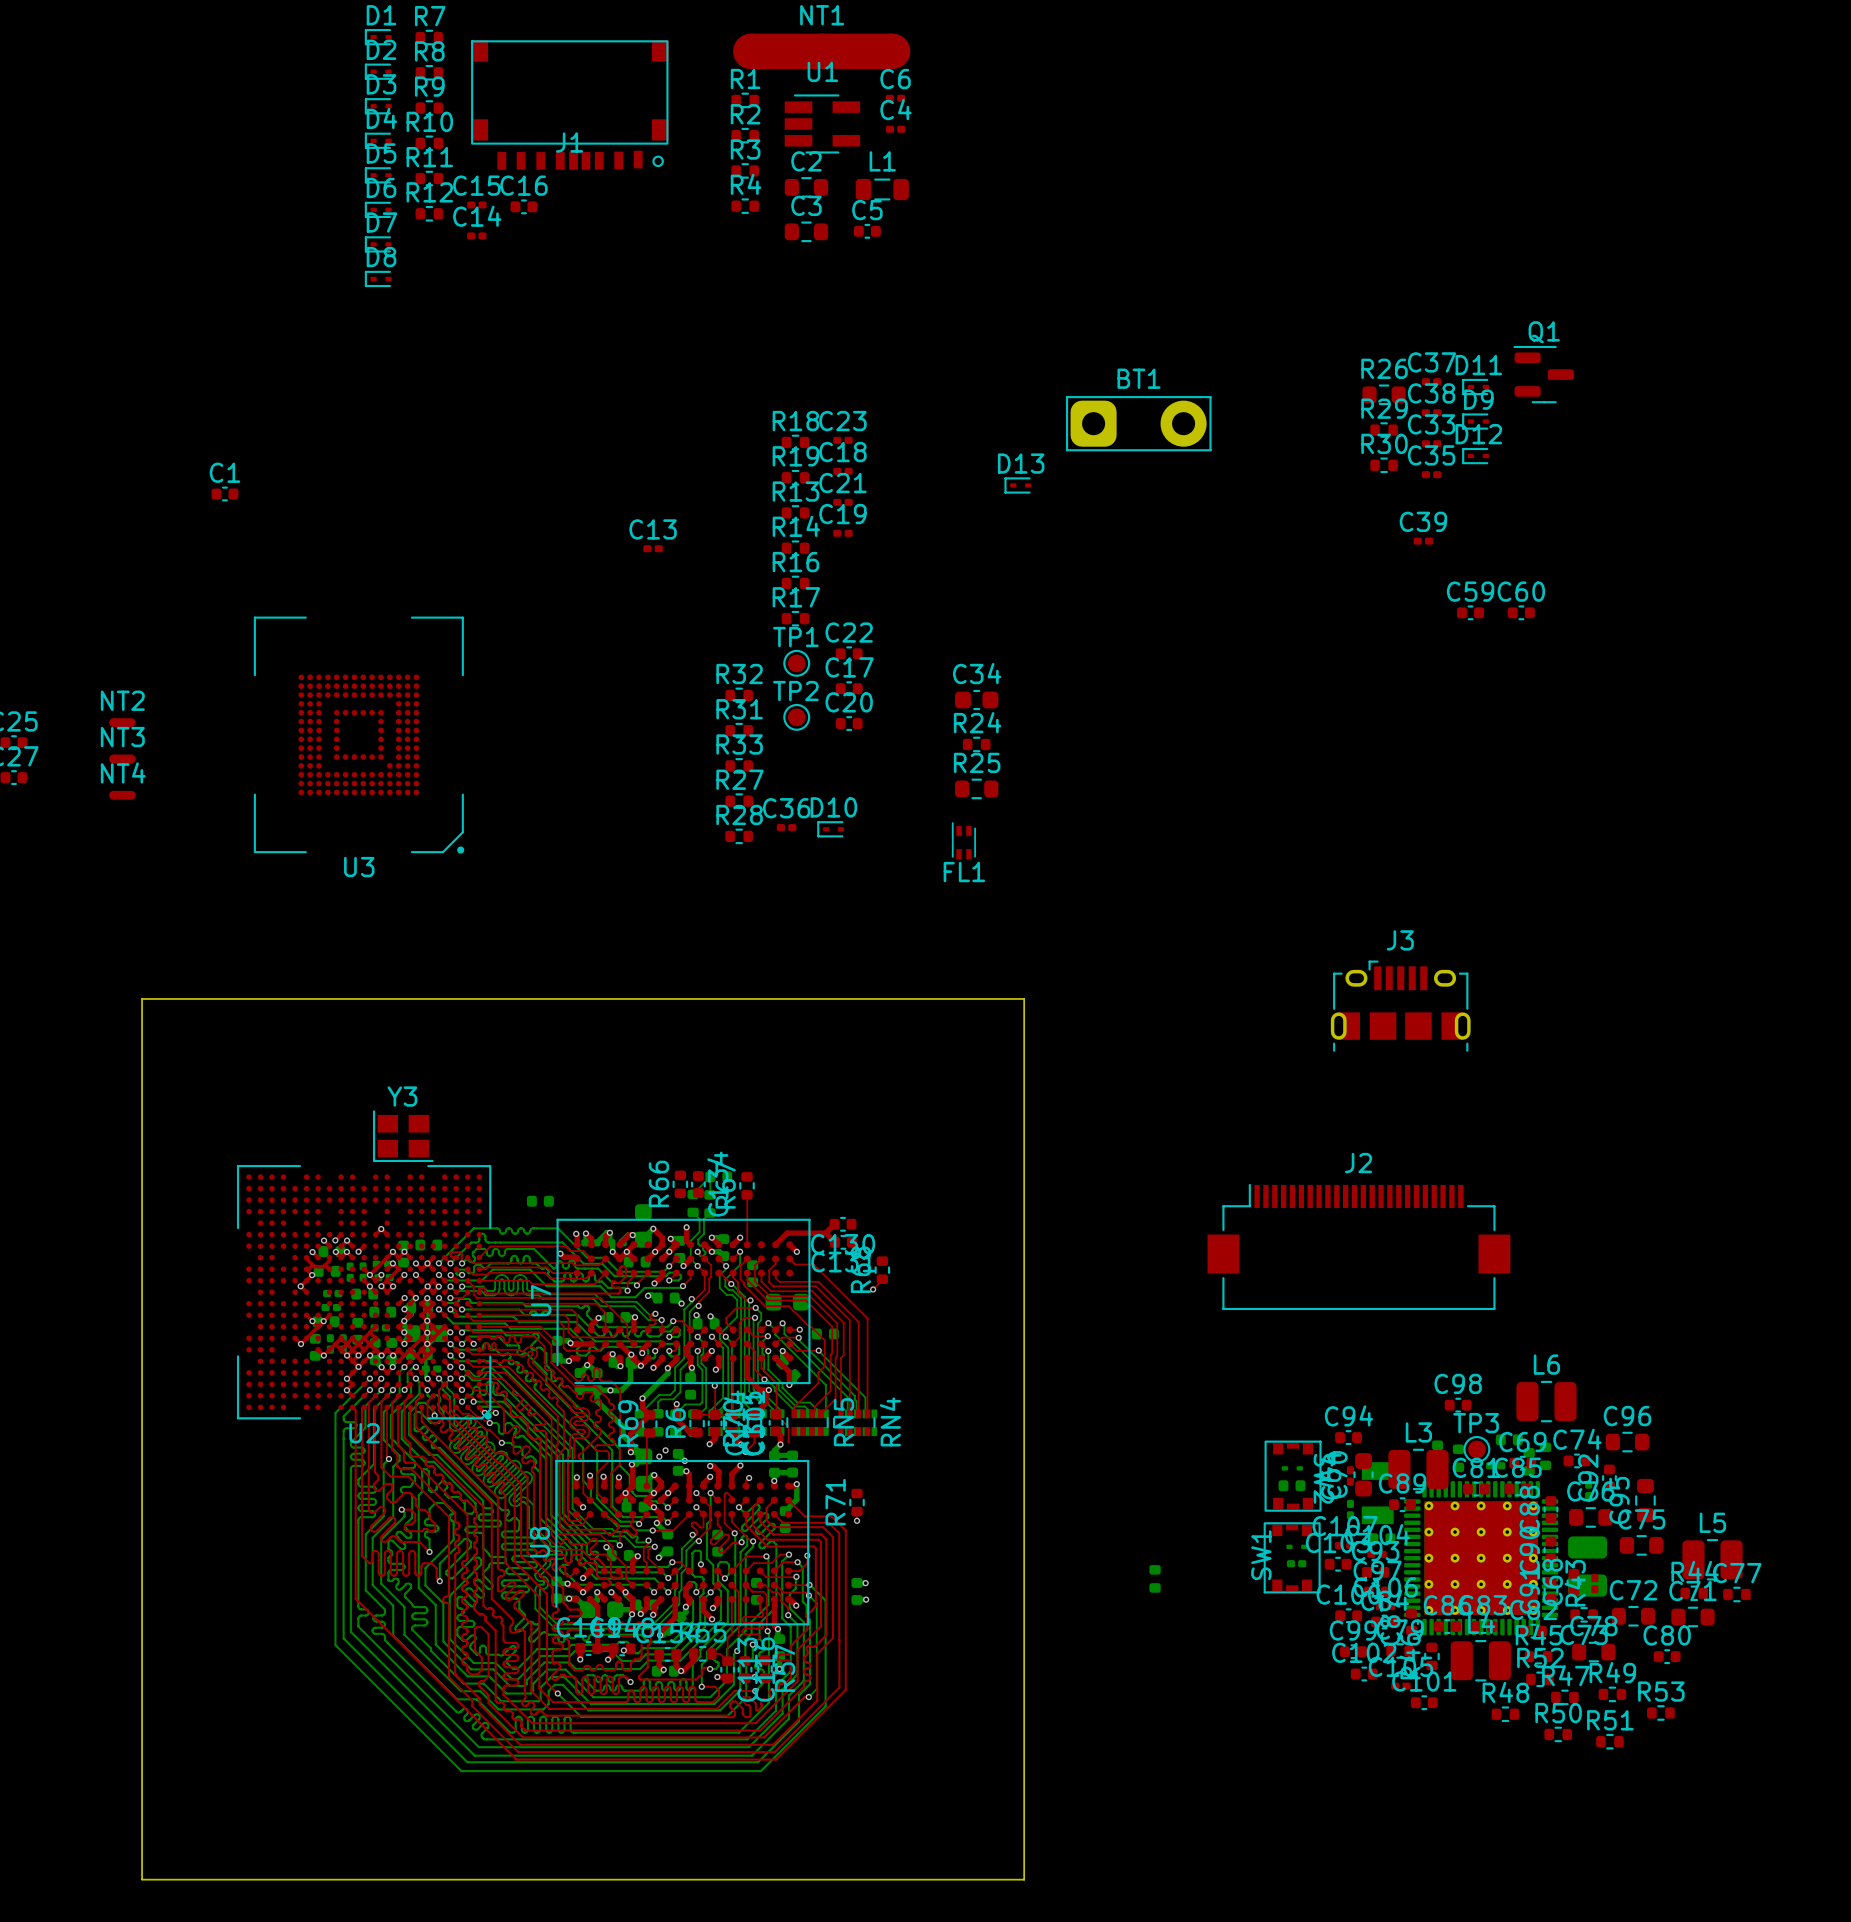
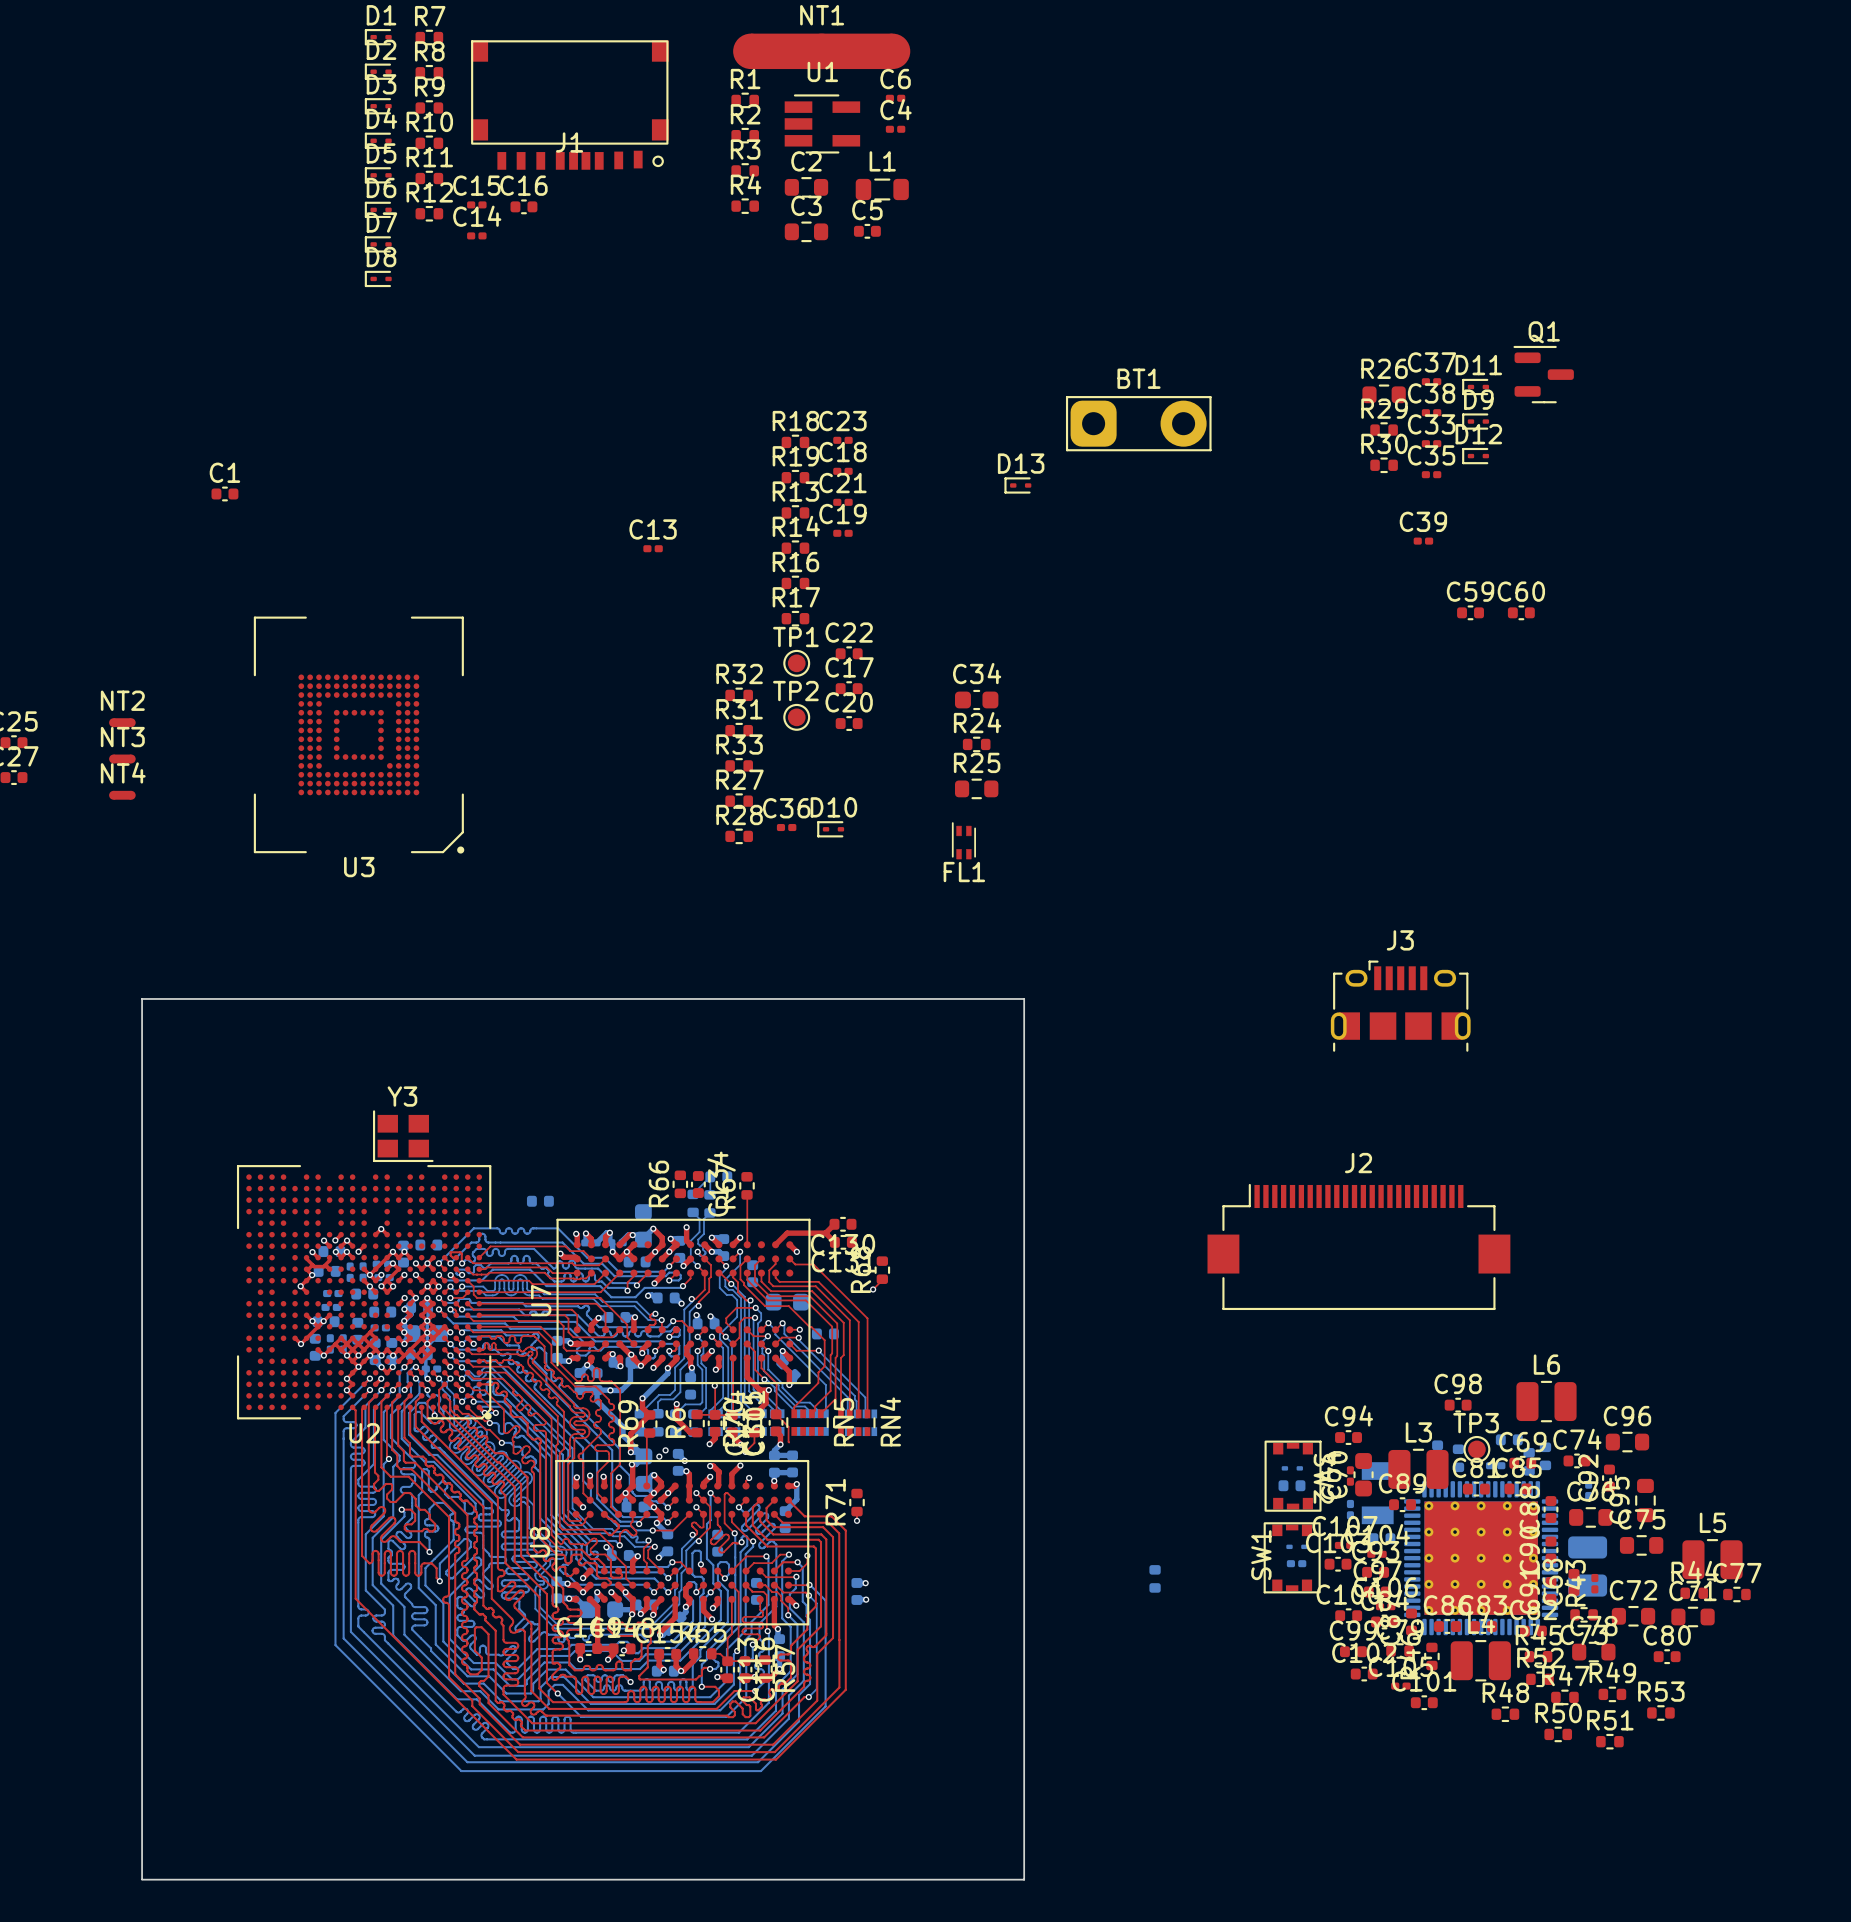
top track: (619, 1273) (619, 1268) (624, 1266) (625, 1276) (619, 1282) (611, 1281) (613, 1287) (620, 1288) (618, 1293) (486, 1293) (483, 1287) (480, 1287) (479, 1292) -> (619, 1273) (600, 1292) (479, 1292)

